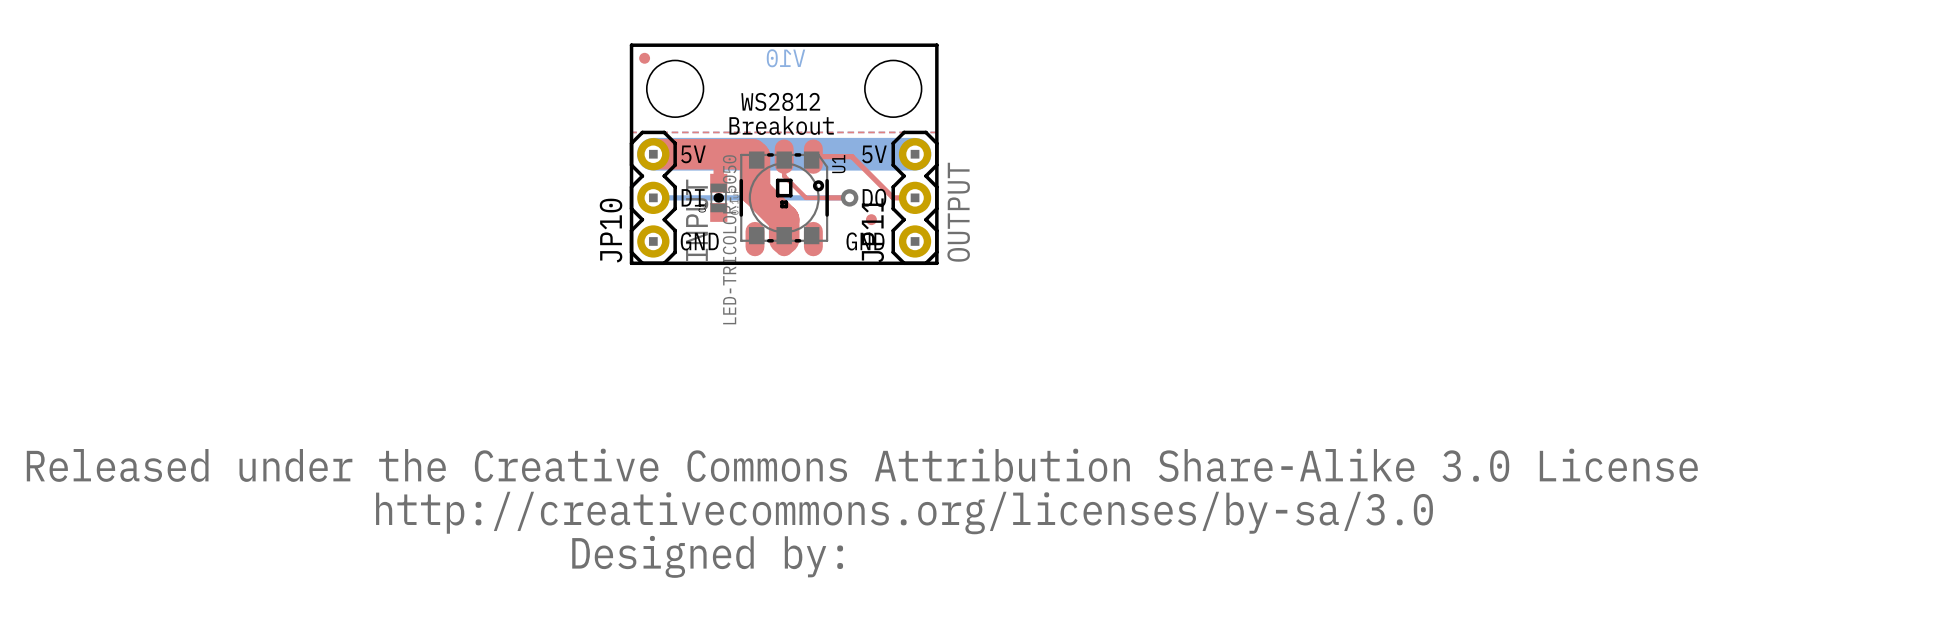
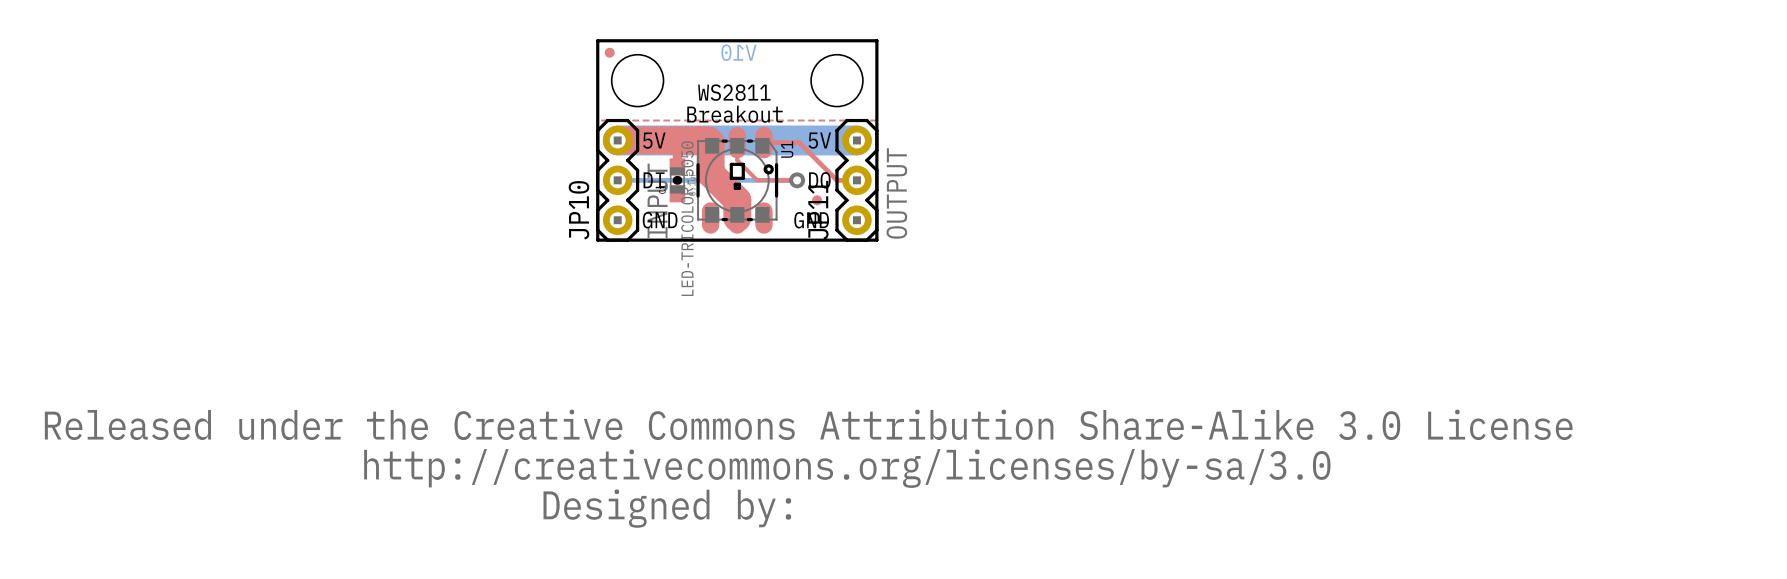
text: WS2812 (780, 101) -> WS2811 (734, 92)

